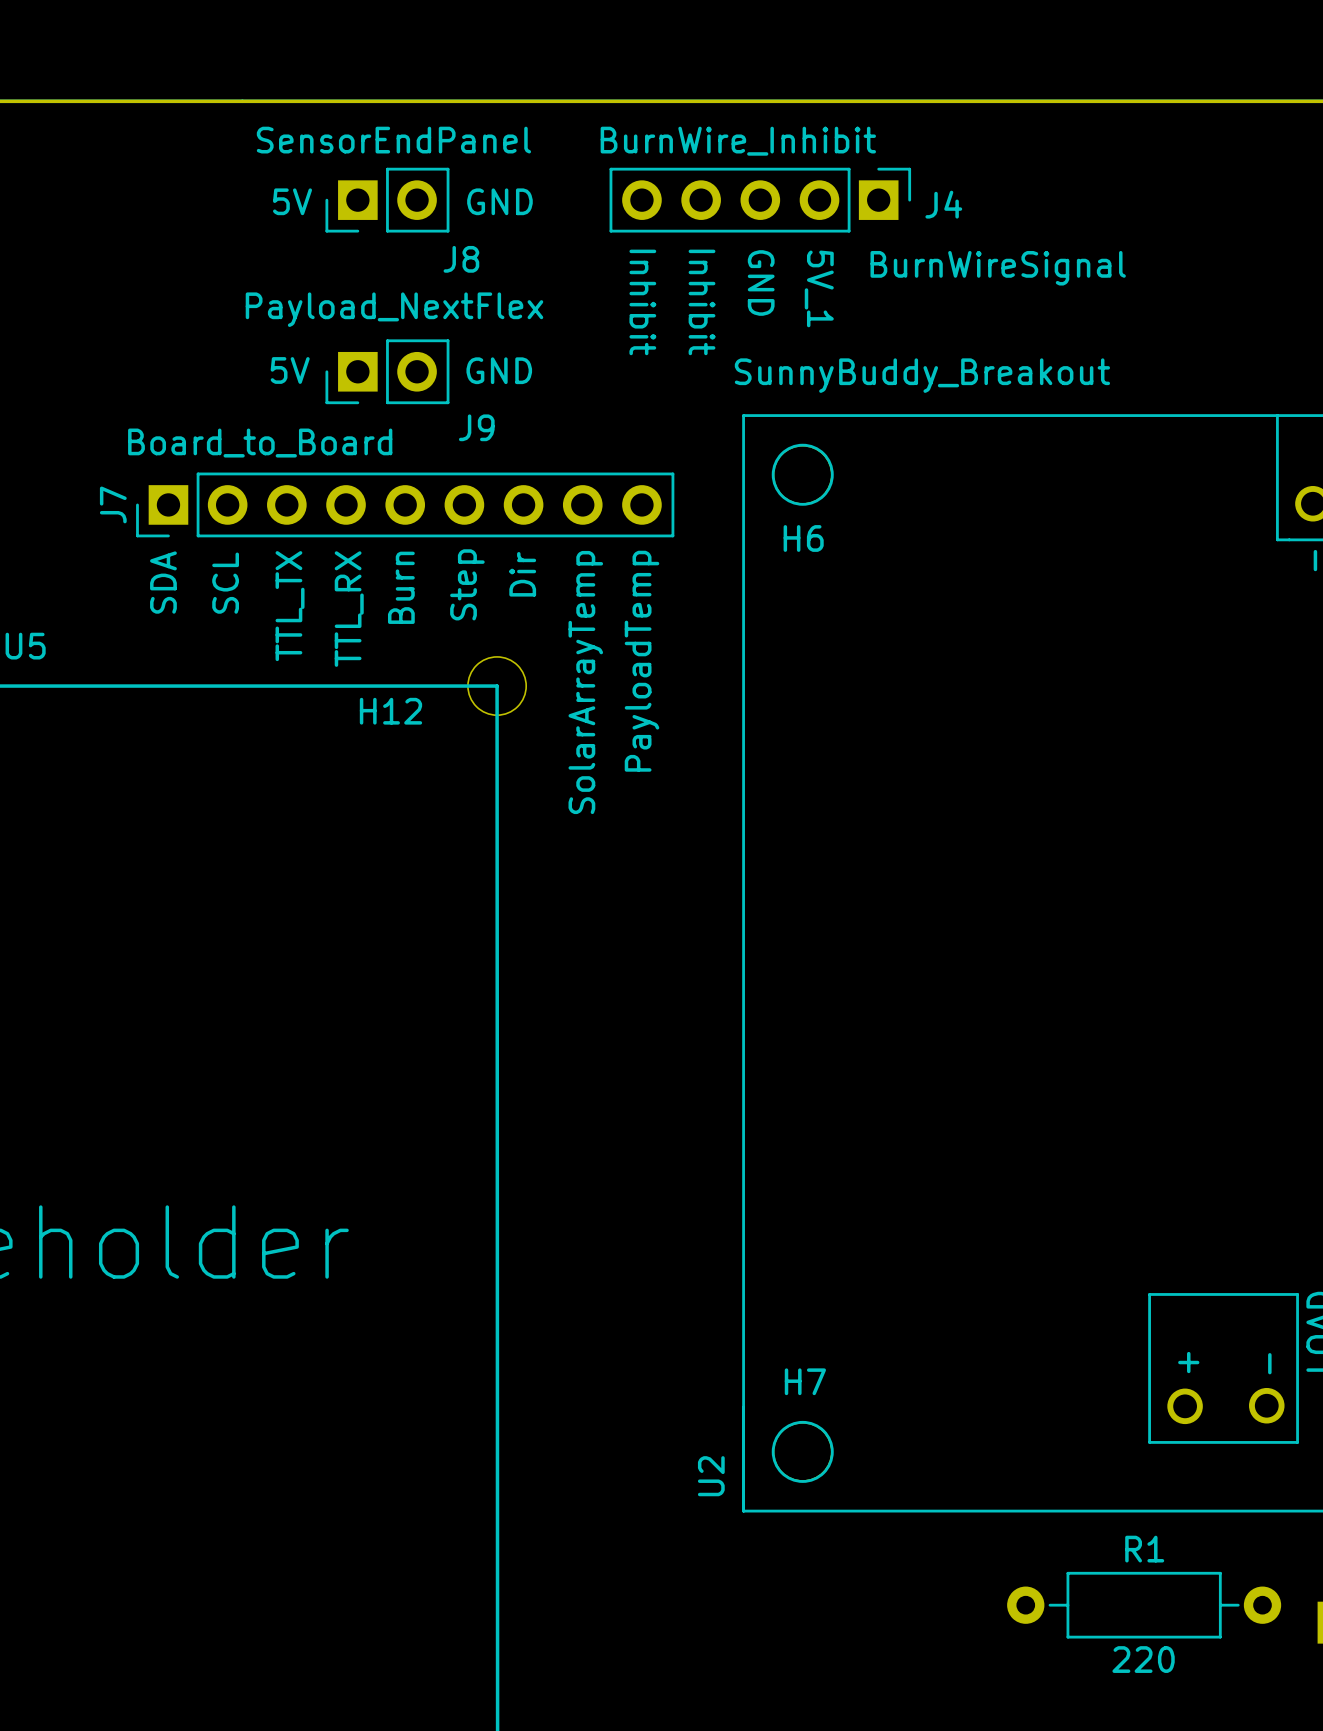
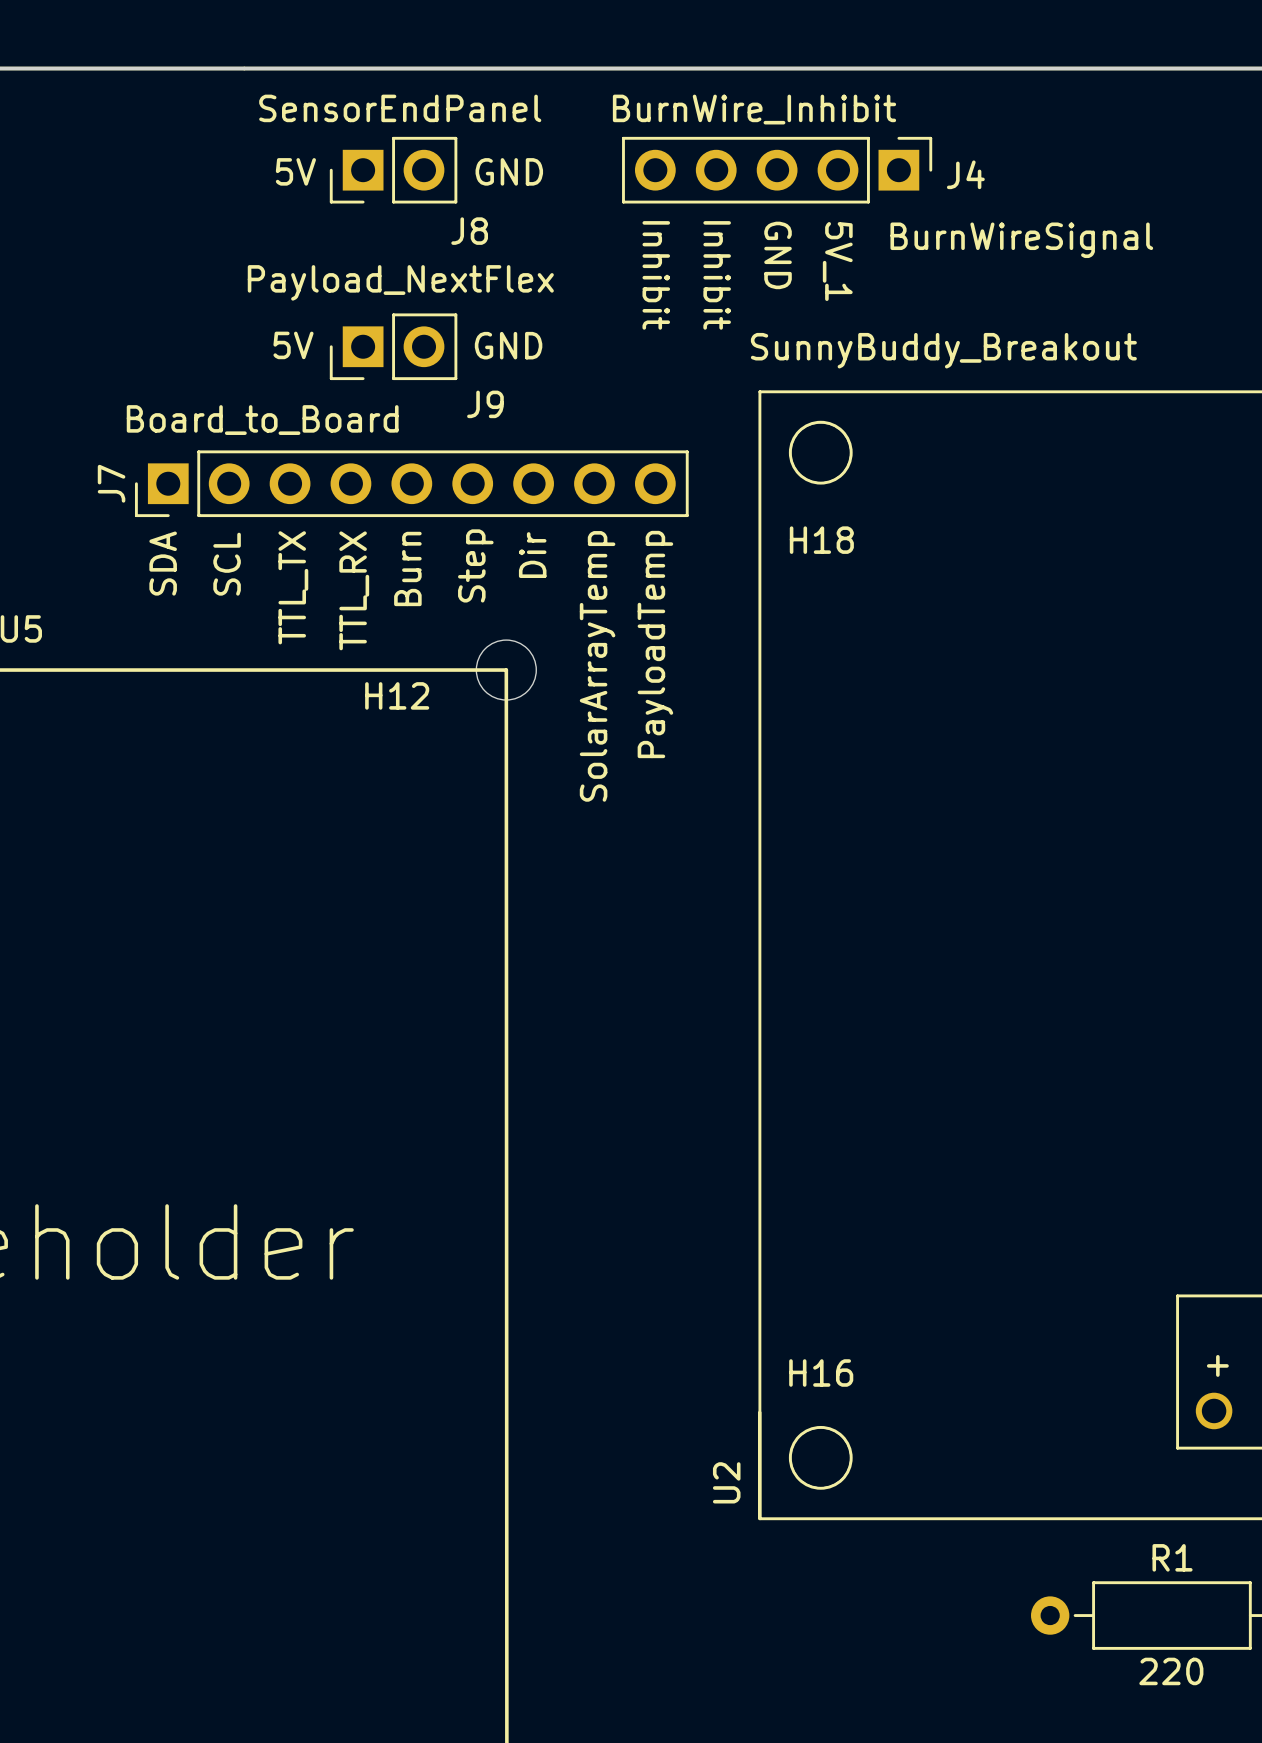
H6 name: H6 (803, 538) -> H18 (821, 540)
H7 name: H7 (805, 1381) -> H16 (821, 1372)

